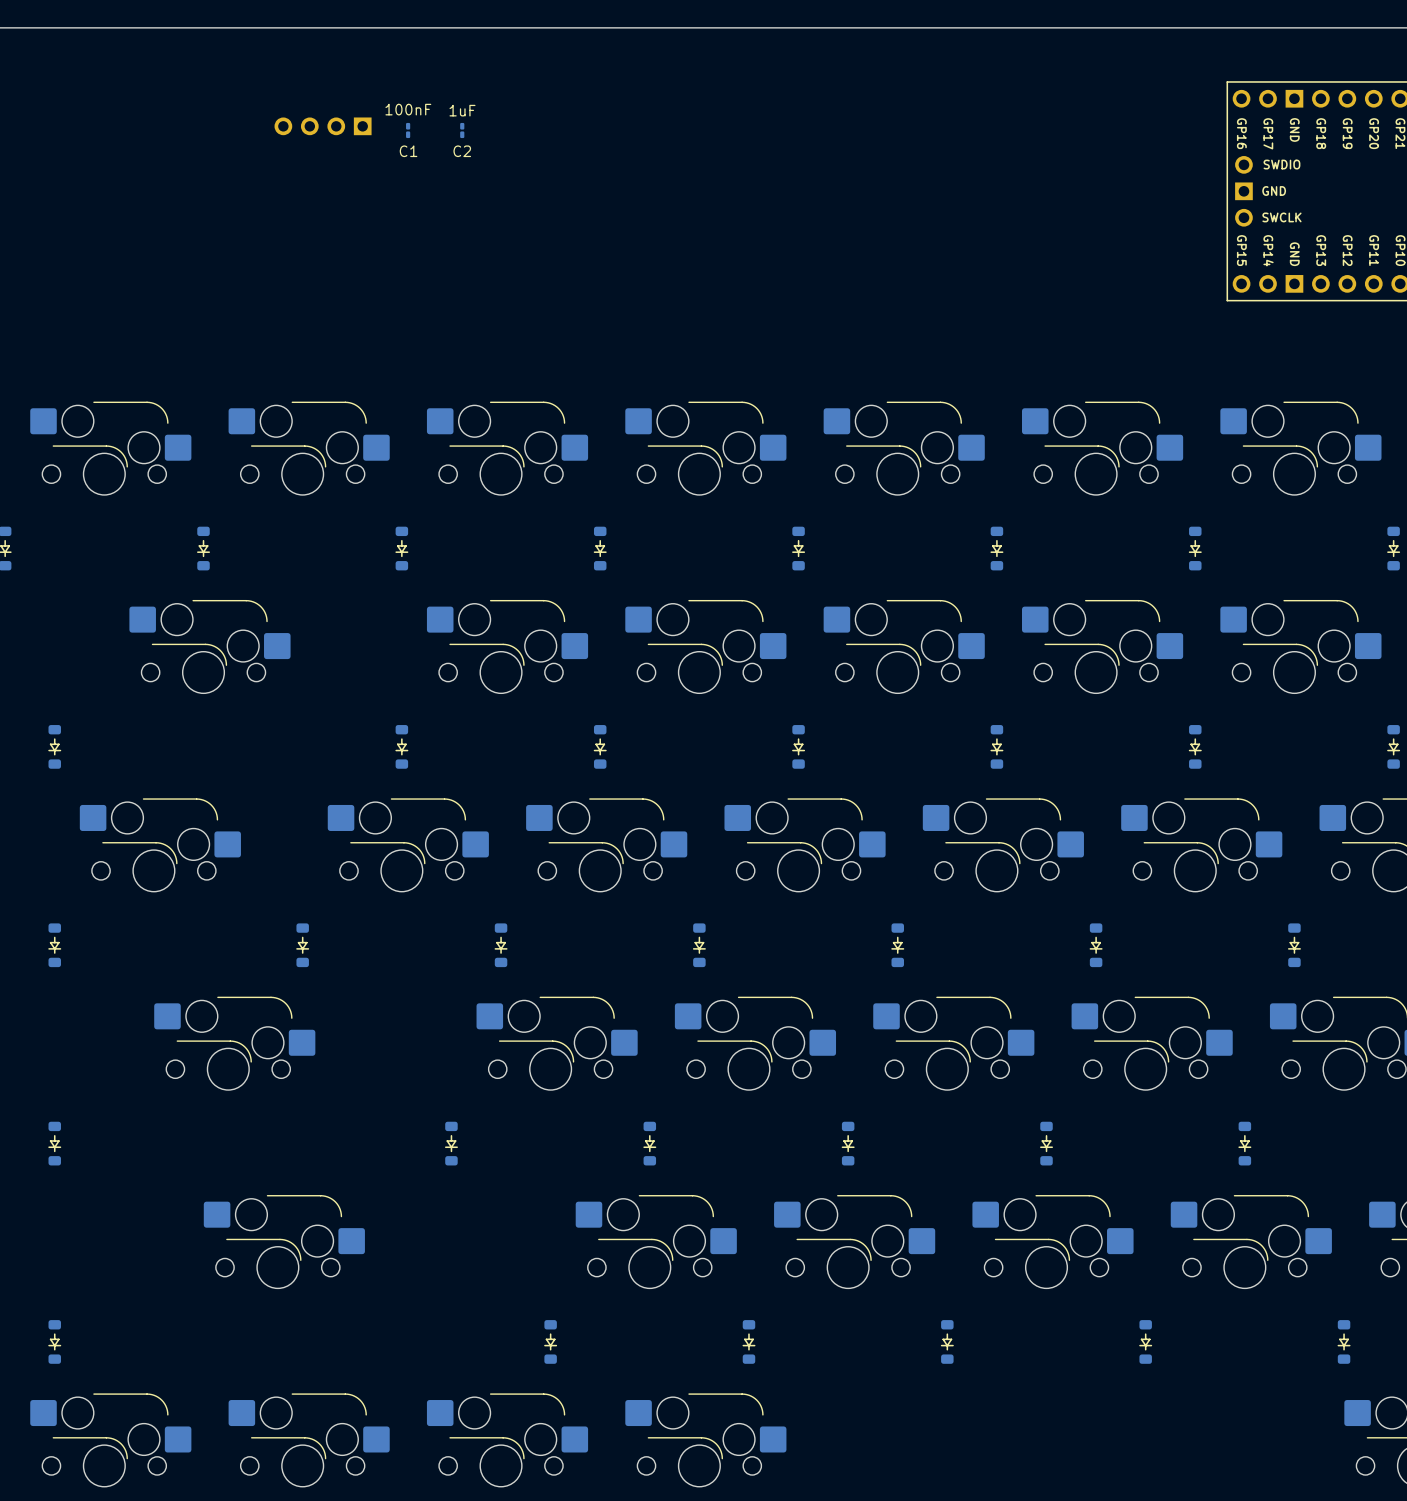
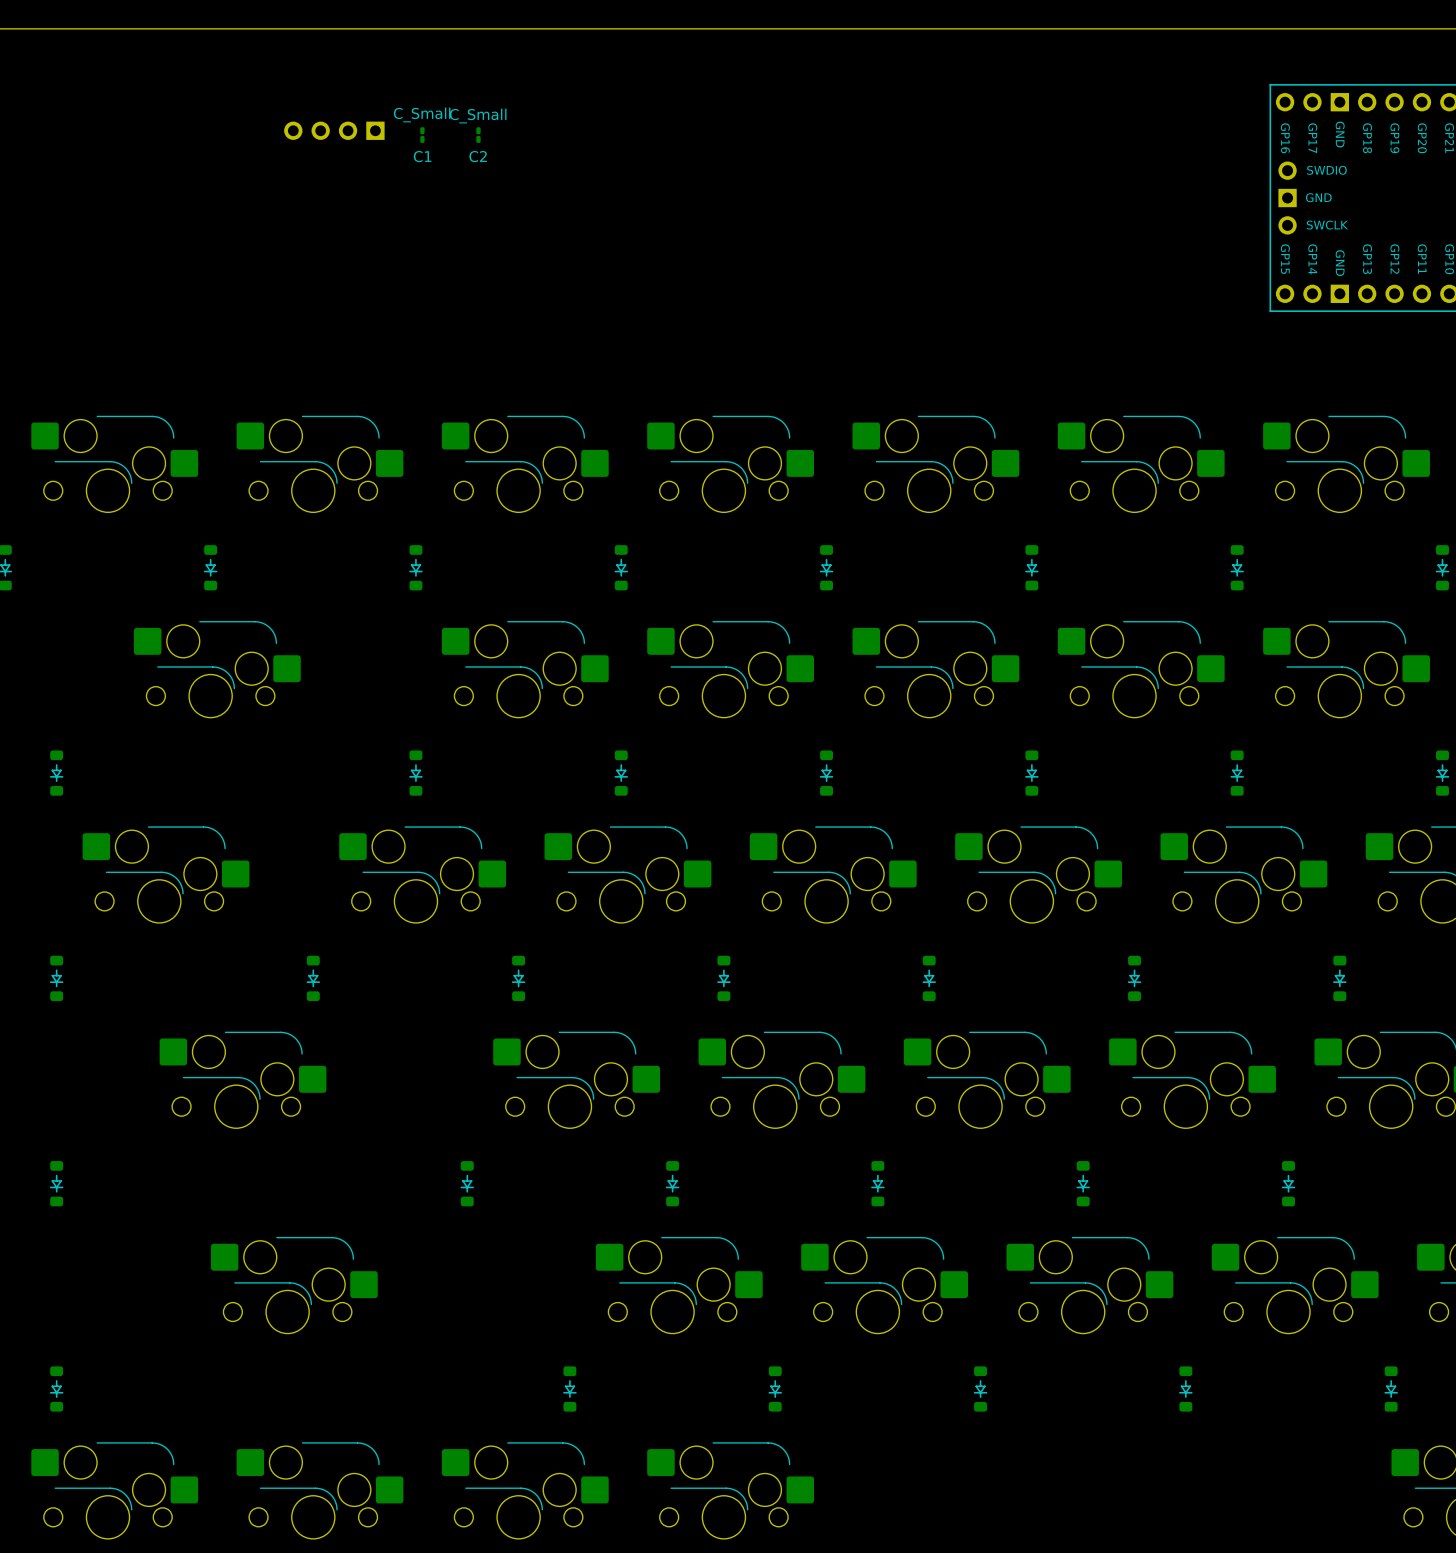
C1 value: 100nF (408, 109) -> C_Small (422, 114)
C2 value: 1uF (462, 110) -> C_Small (478, 116)

